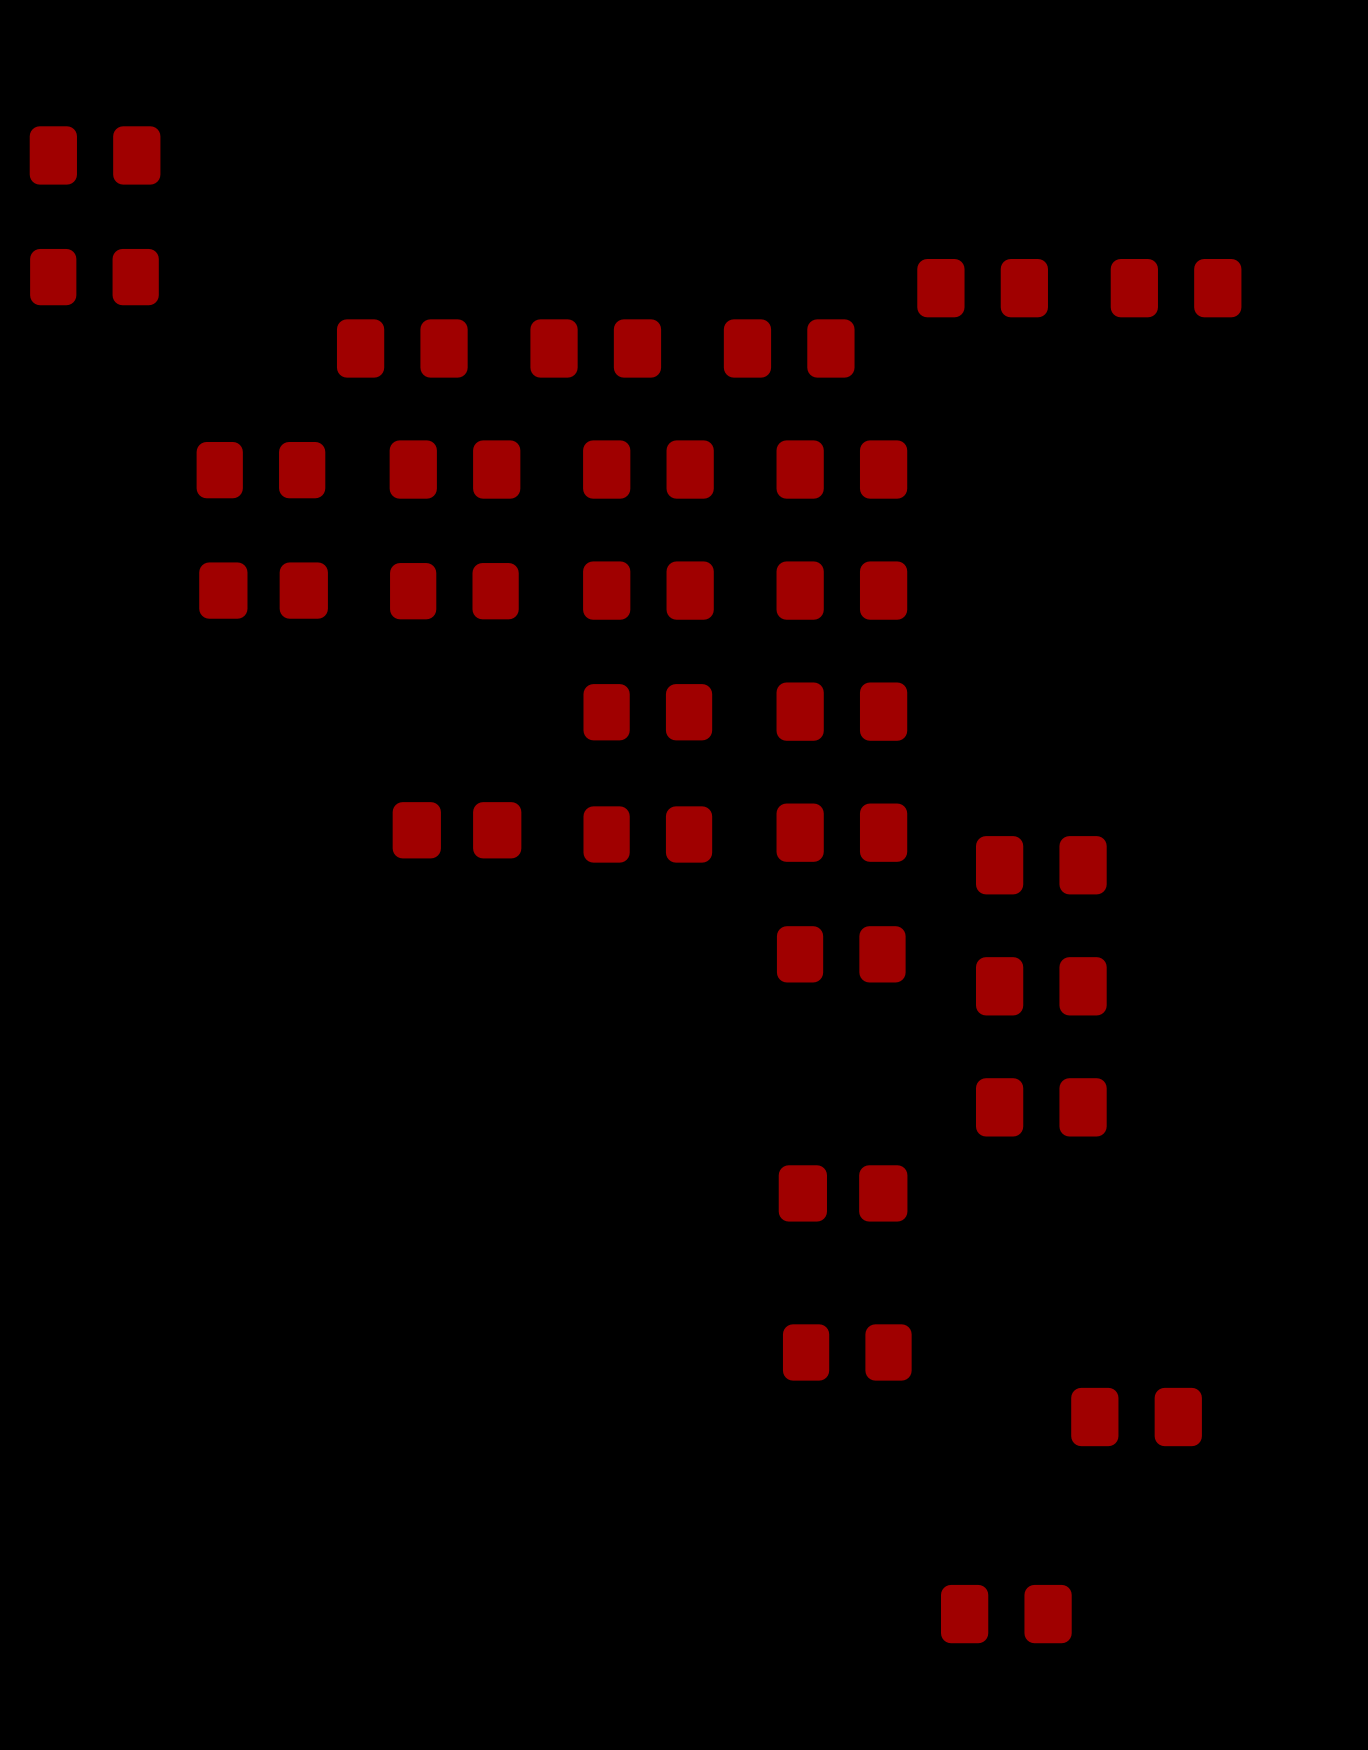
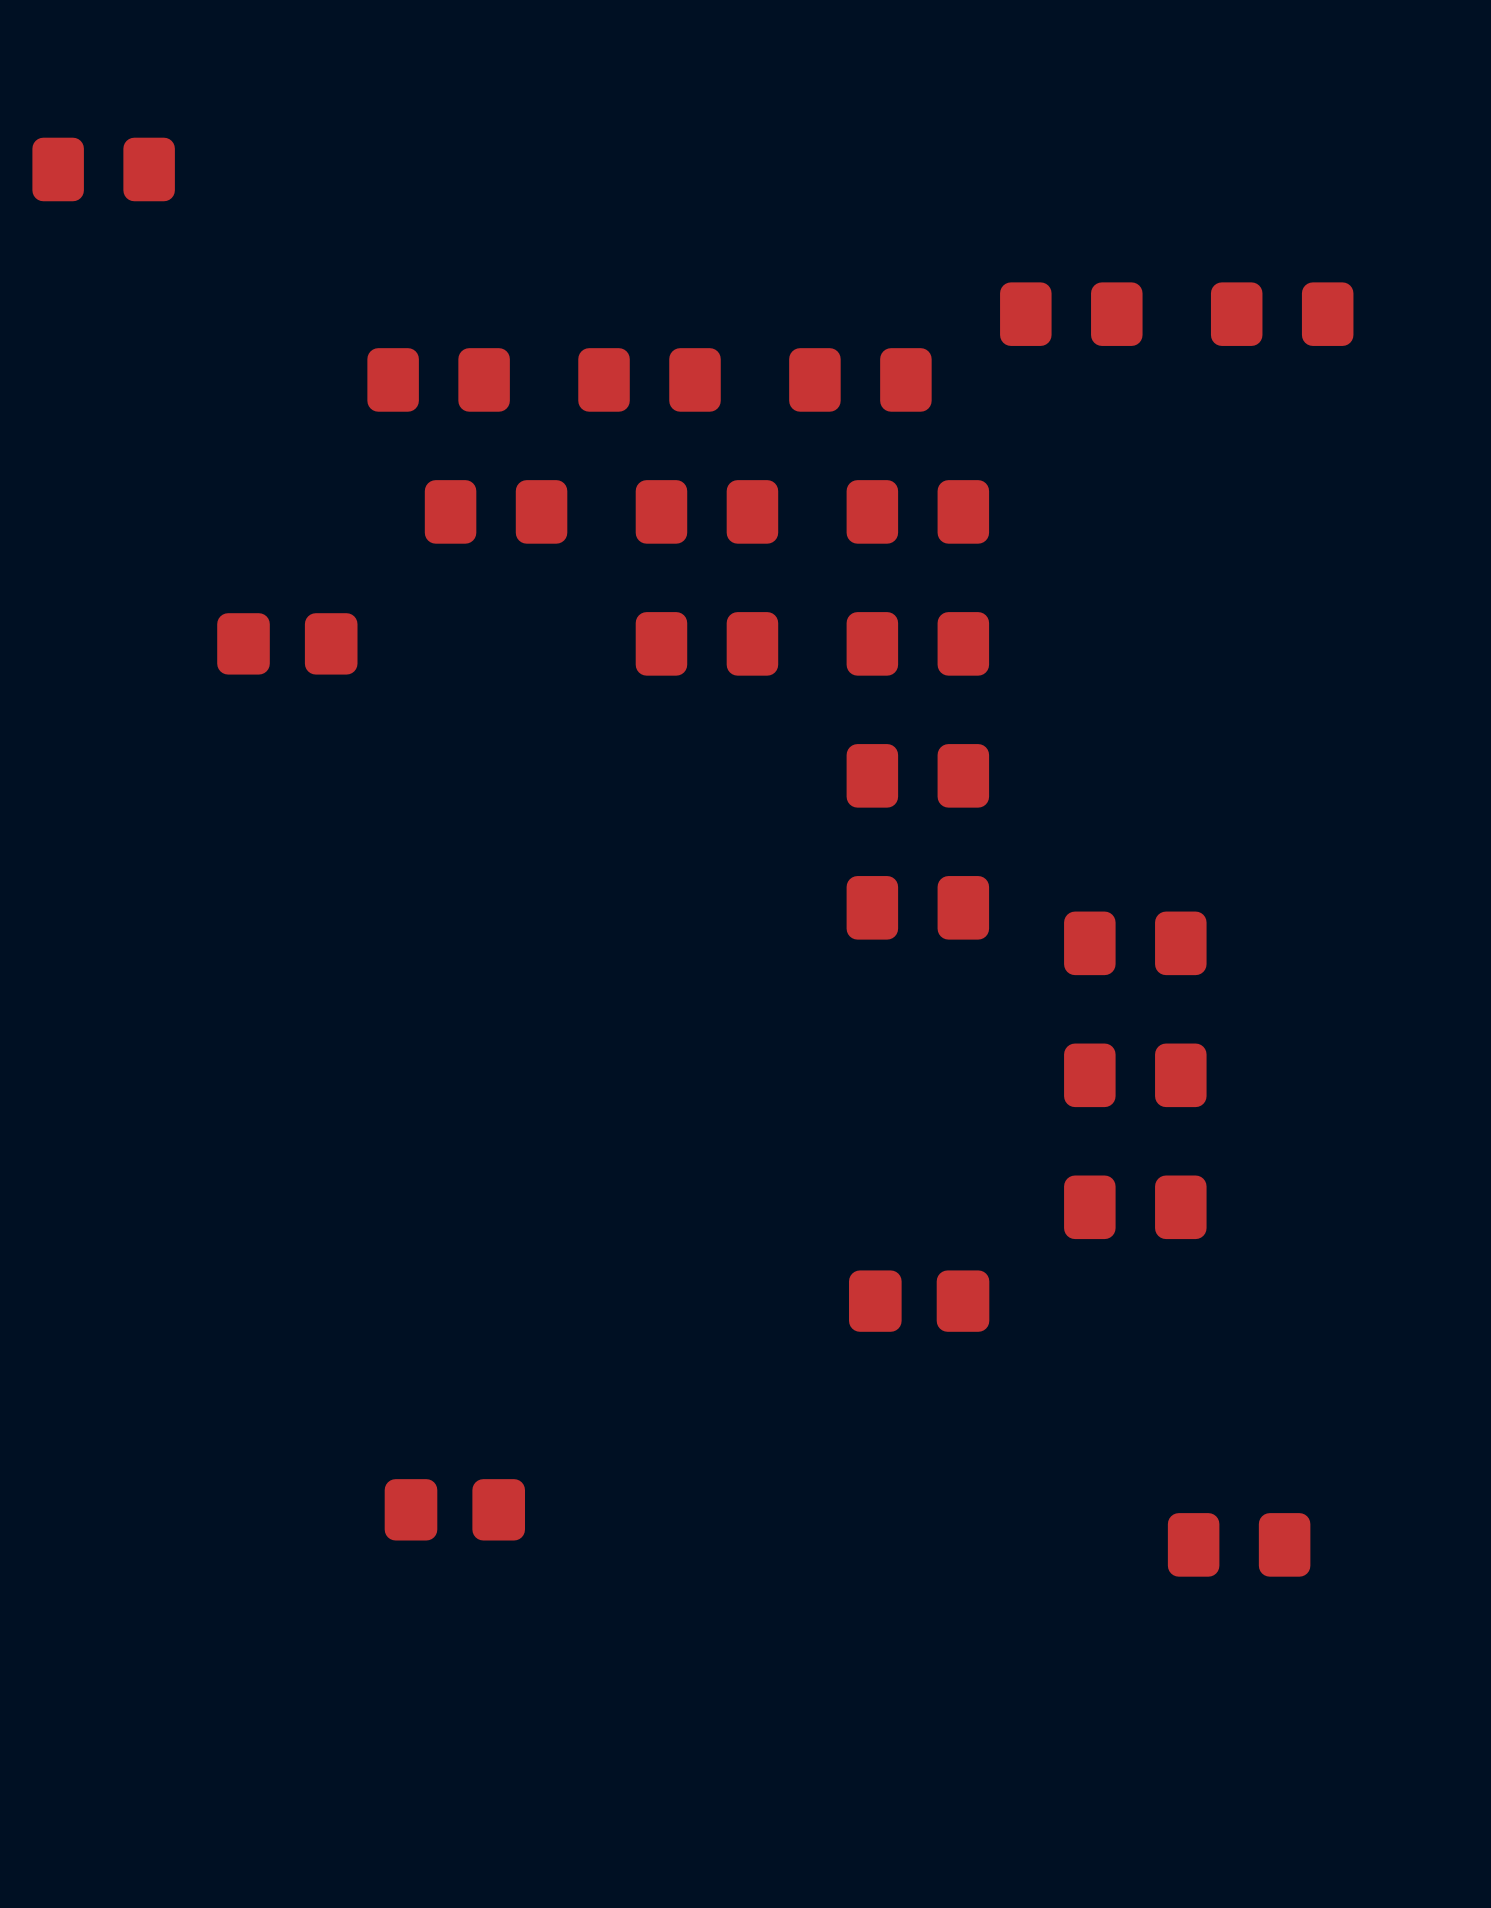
part: (94, 277) -> none
part: (260, 470) -> none
part: (454, 591) -> none
part: (647, 712) -> none
part position: (457, 830) -> (454, 1509)
part: (647, 834) -> none
part: (841, 954) -> none
part: (847, 1352) -> none
part: (1006, 1614) -> none

